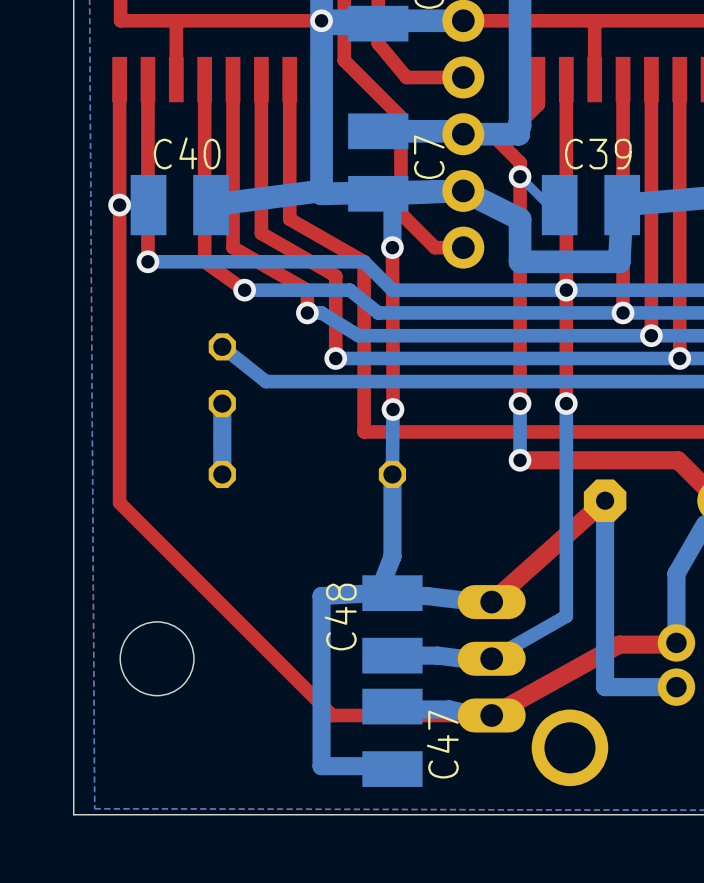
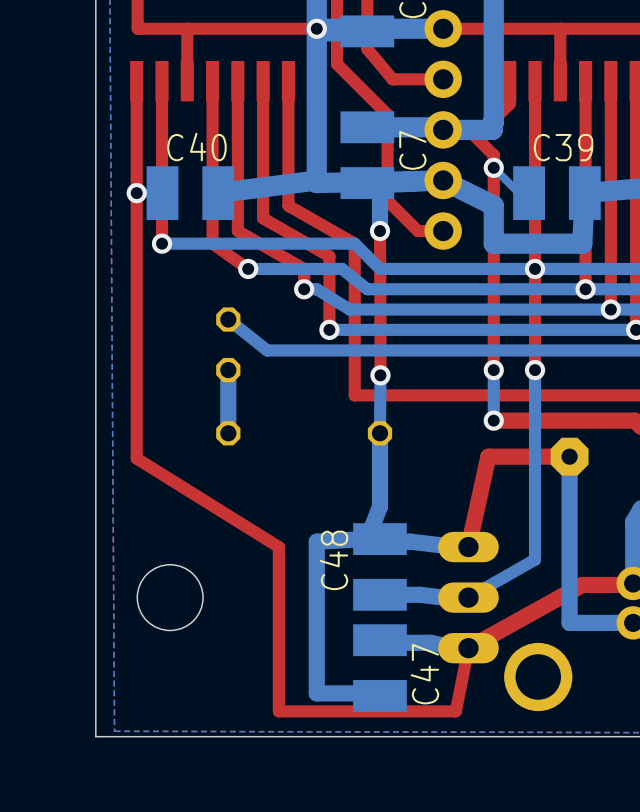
top track: (605, 500) (491, 602) -> (569, 456) (488, 456) (468, 547)
top track: (119, 502) (332, 715) (491, 715) -> (136, 458) (278, 547) (278, 711) (455, 711) (468, 648)

